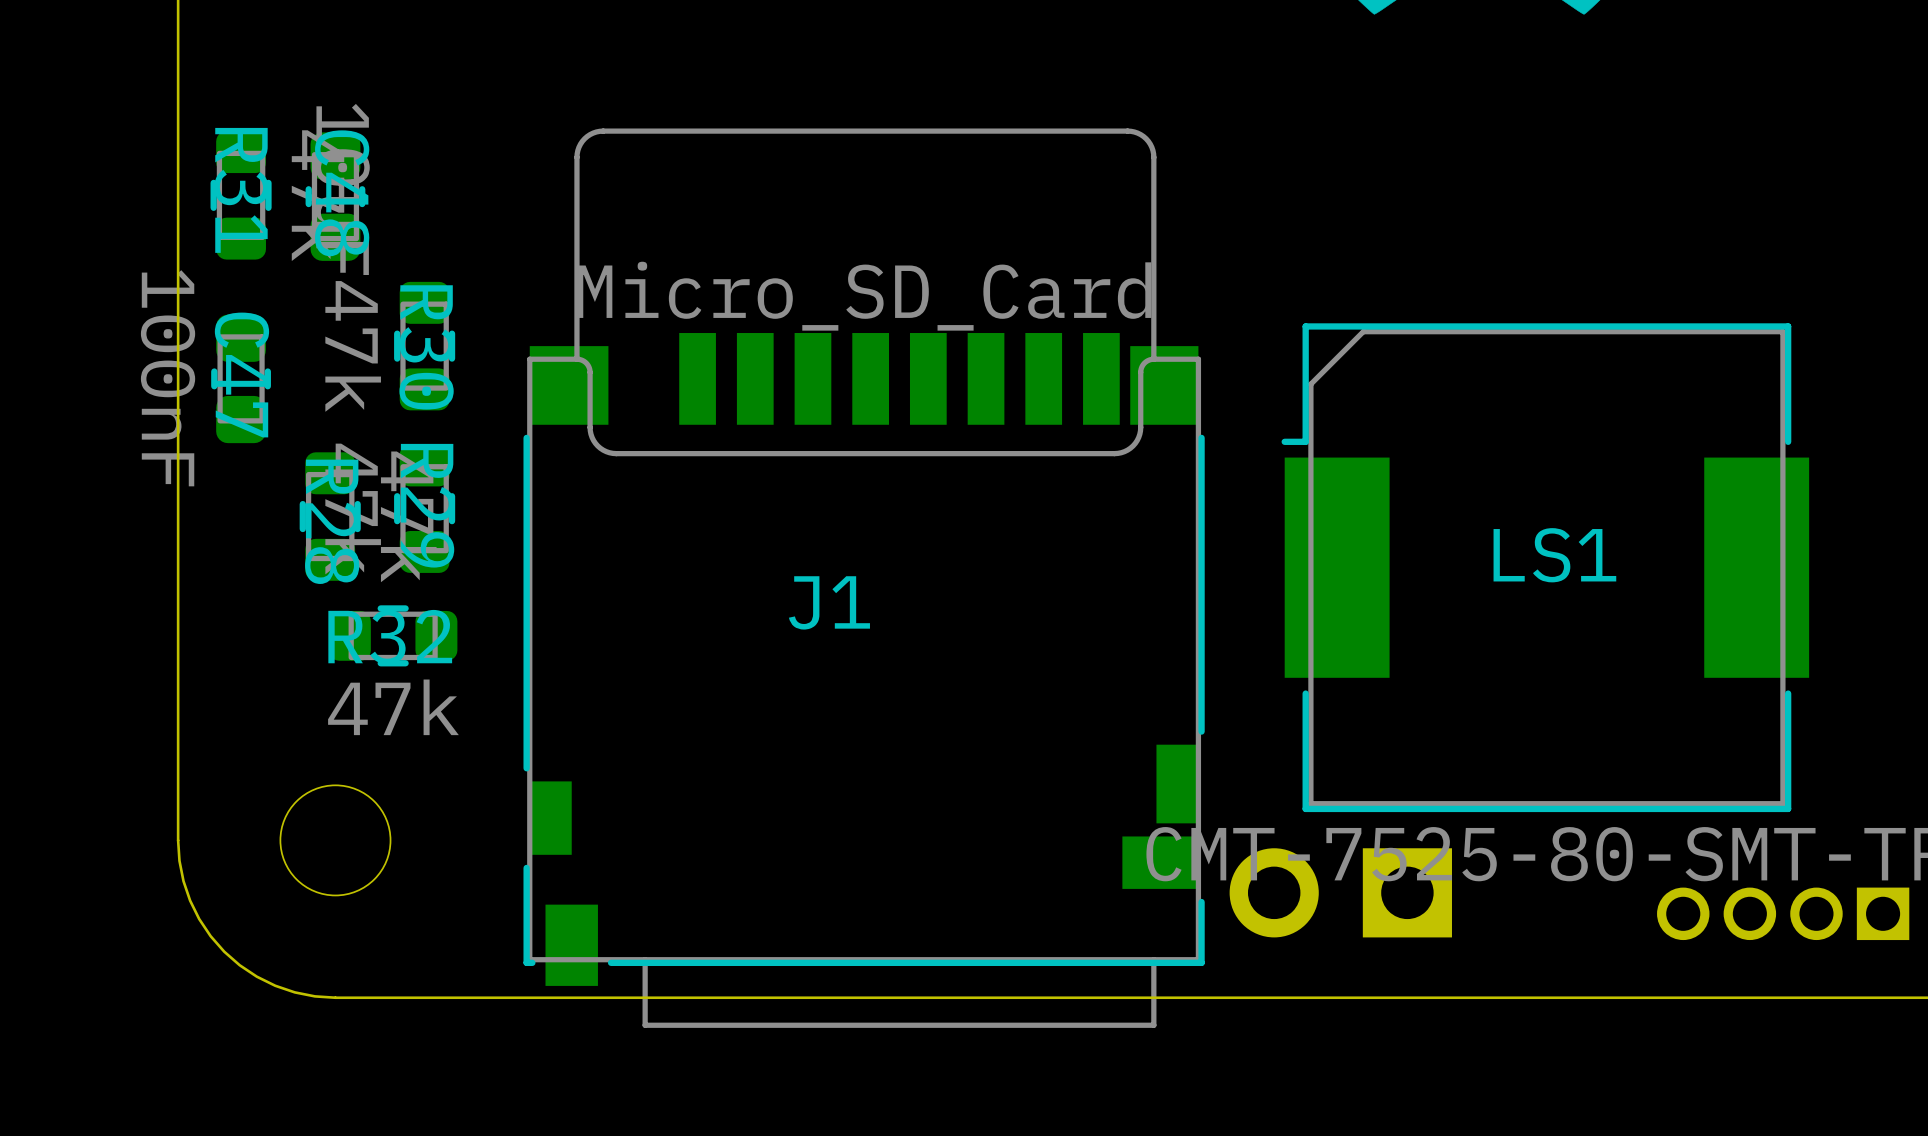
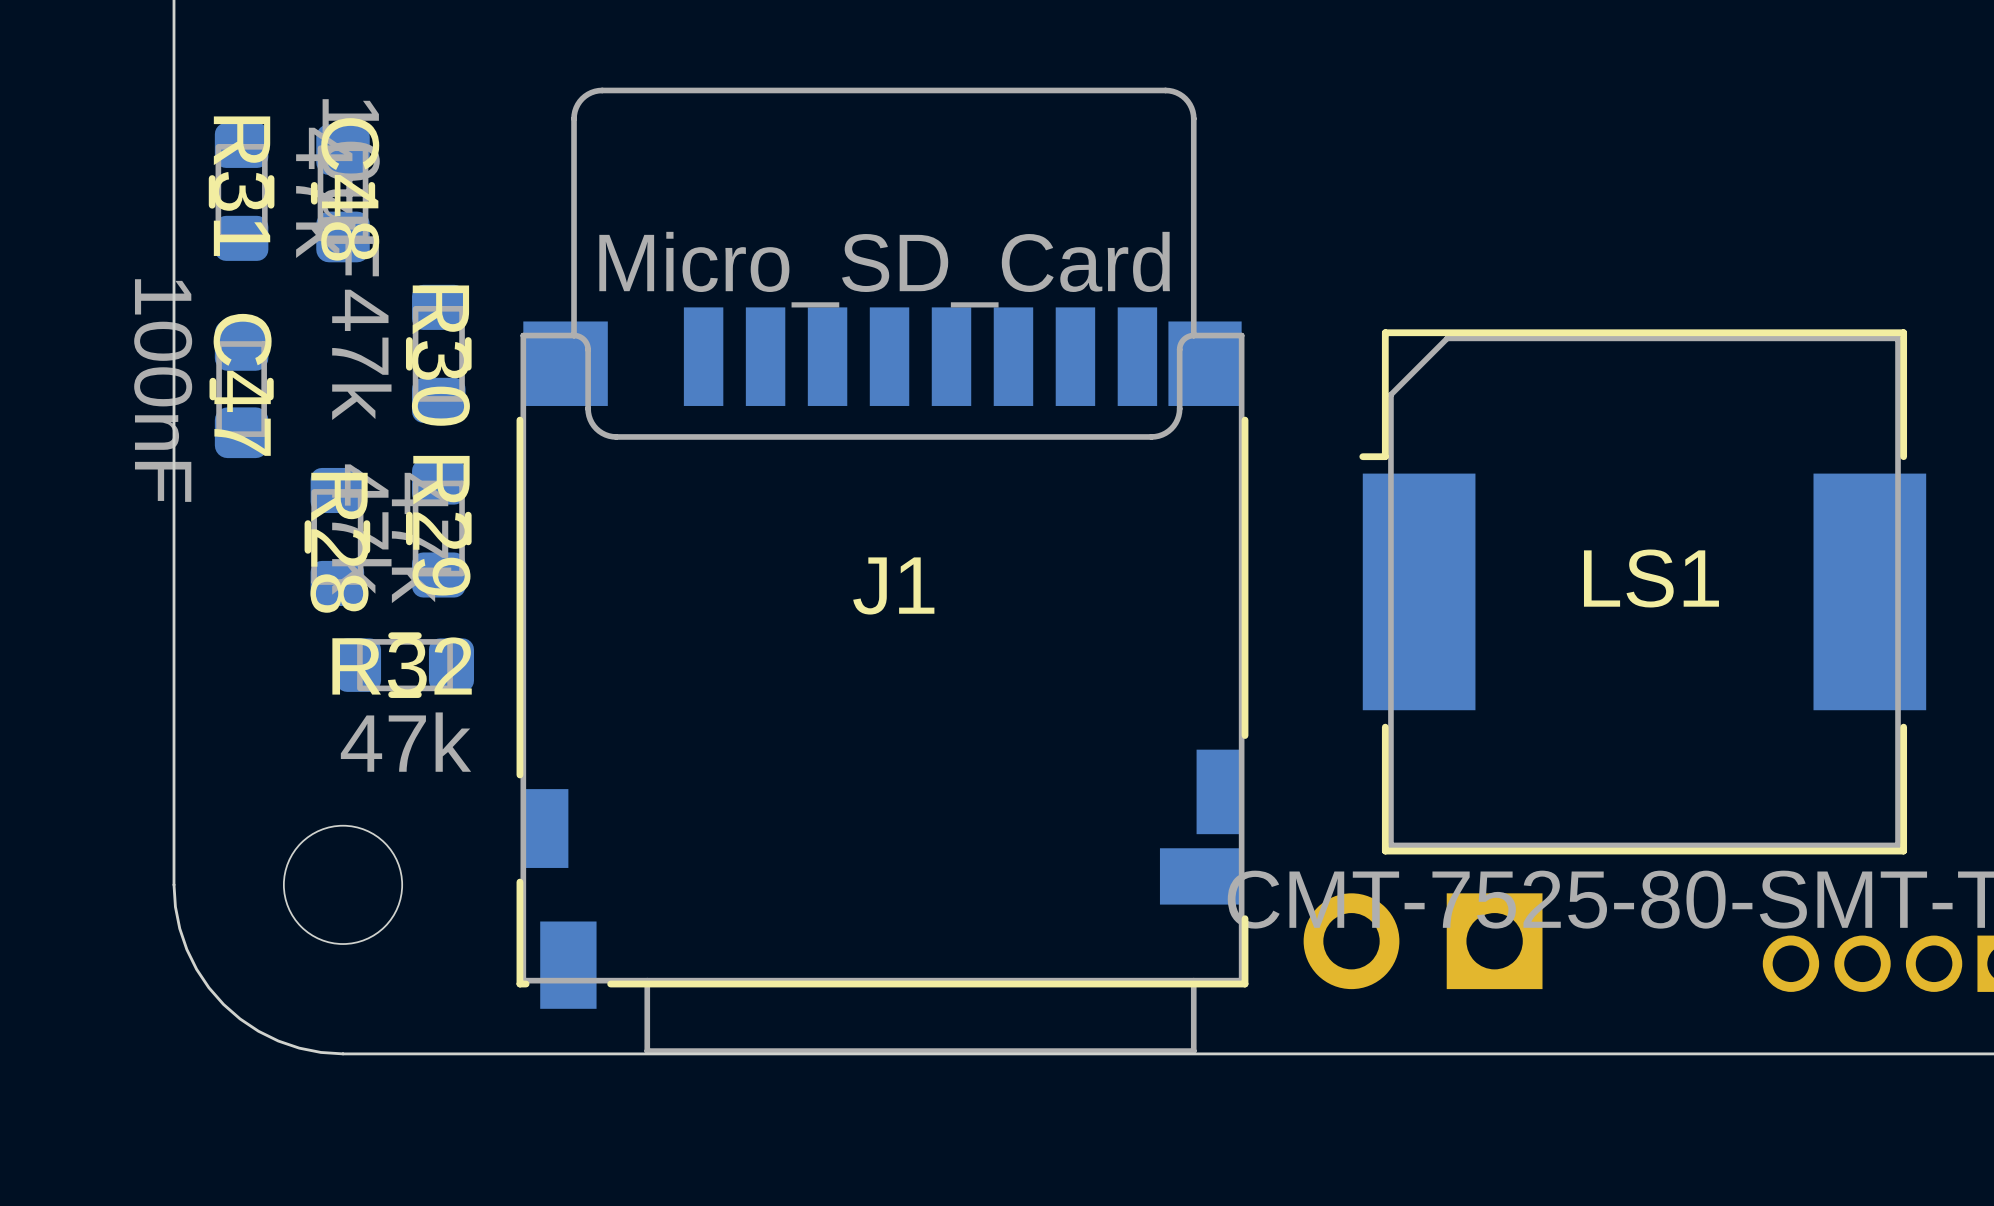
J1 position: (864, 578) -> (882, 570)
J1 name position: J1 (829, 602) -> J1 (893, 585)

